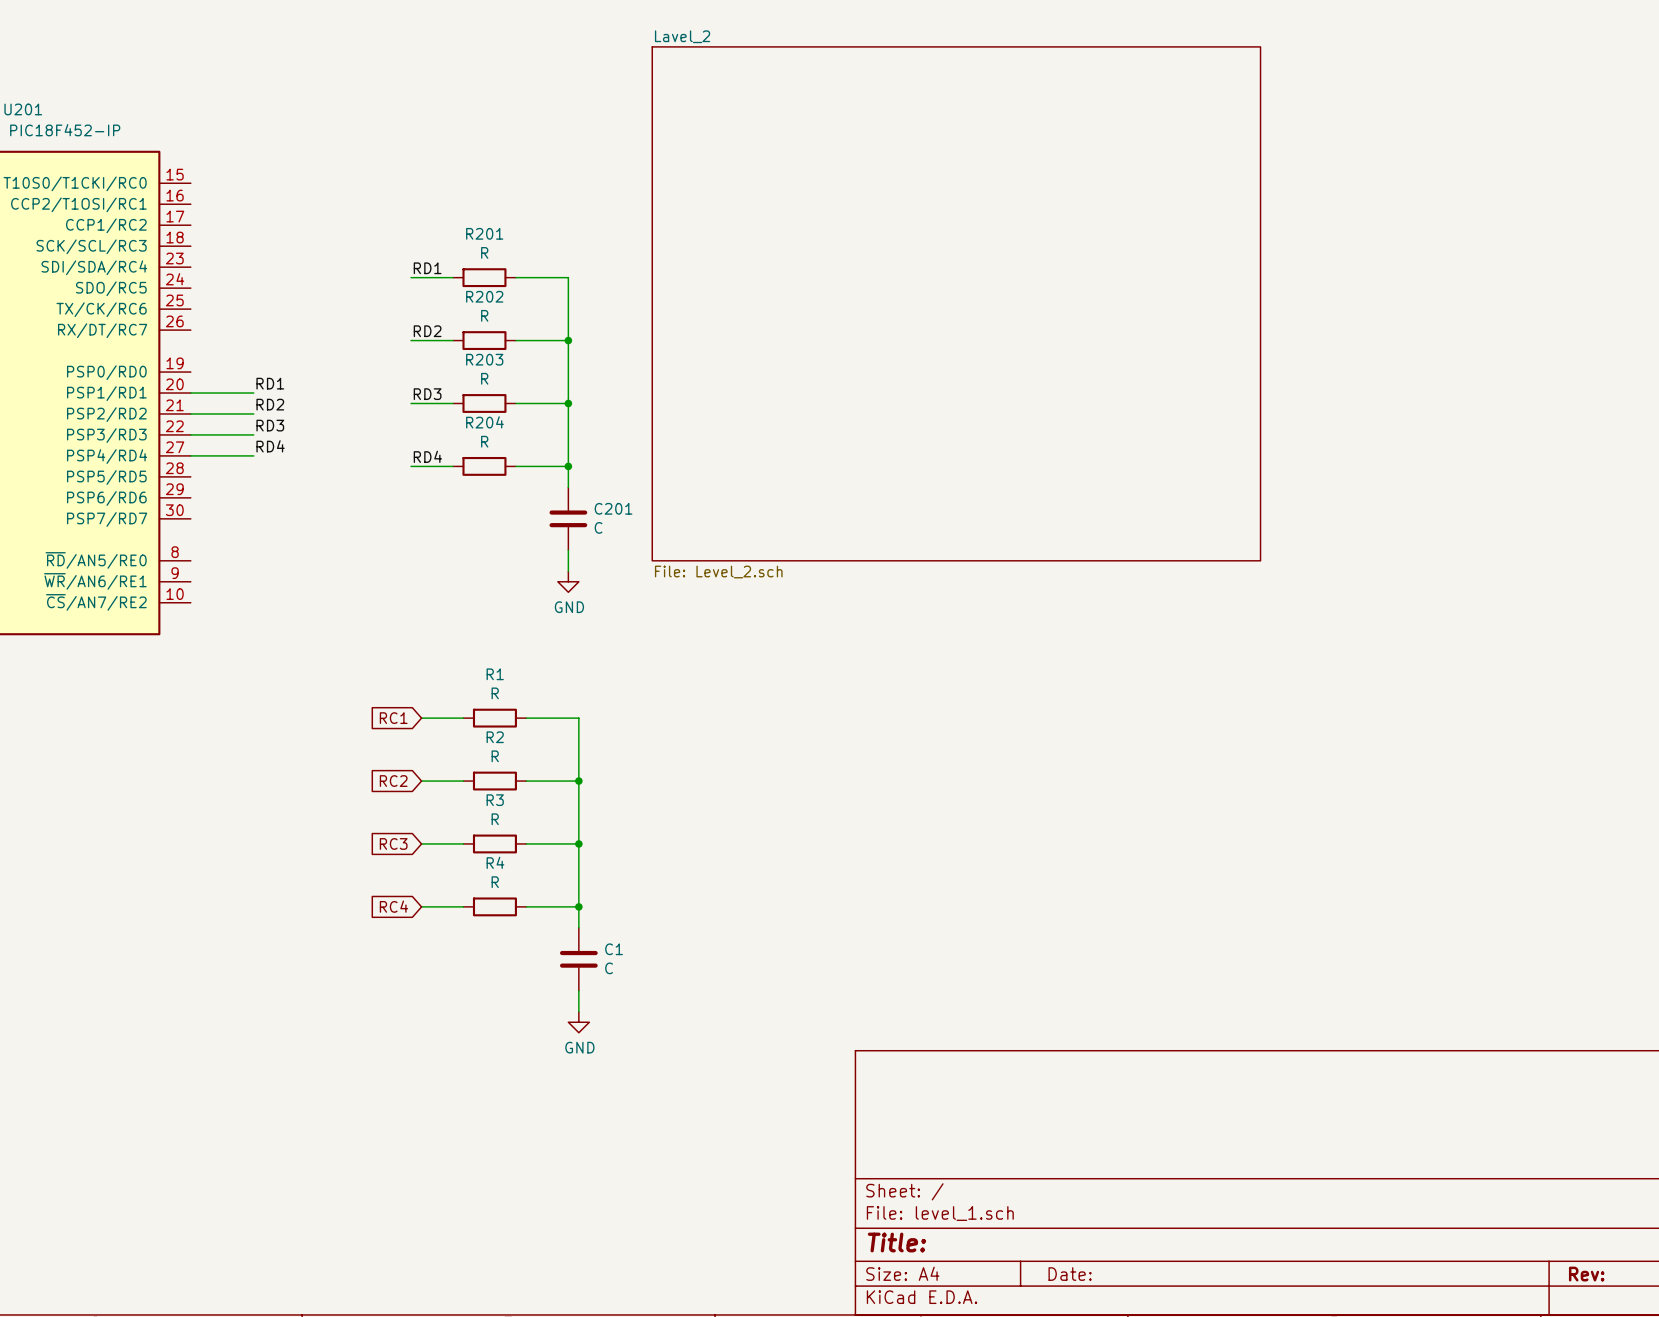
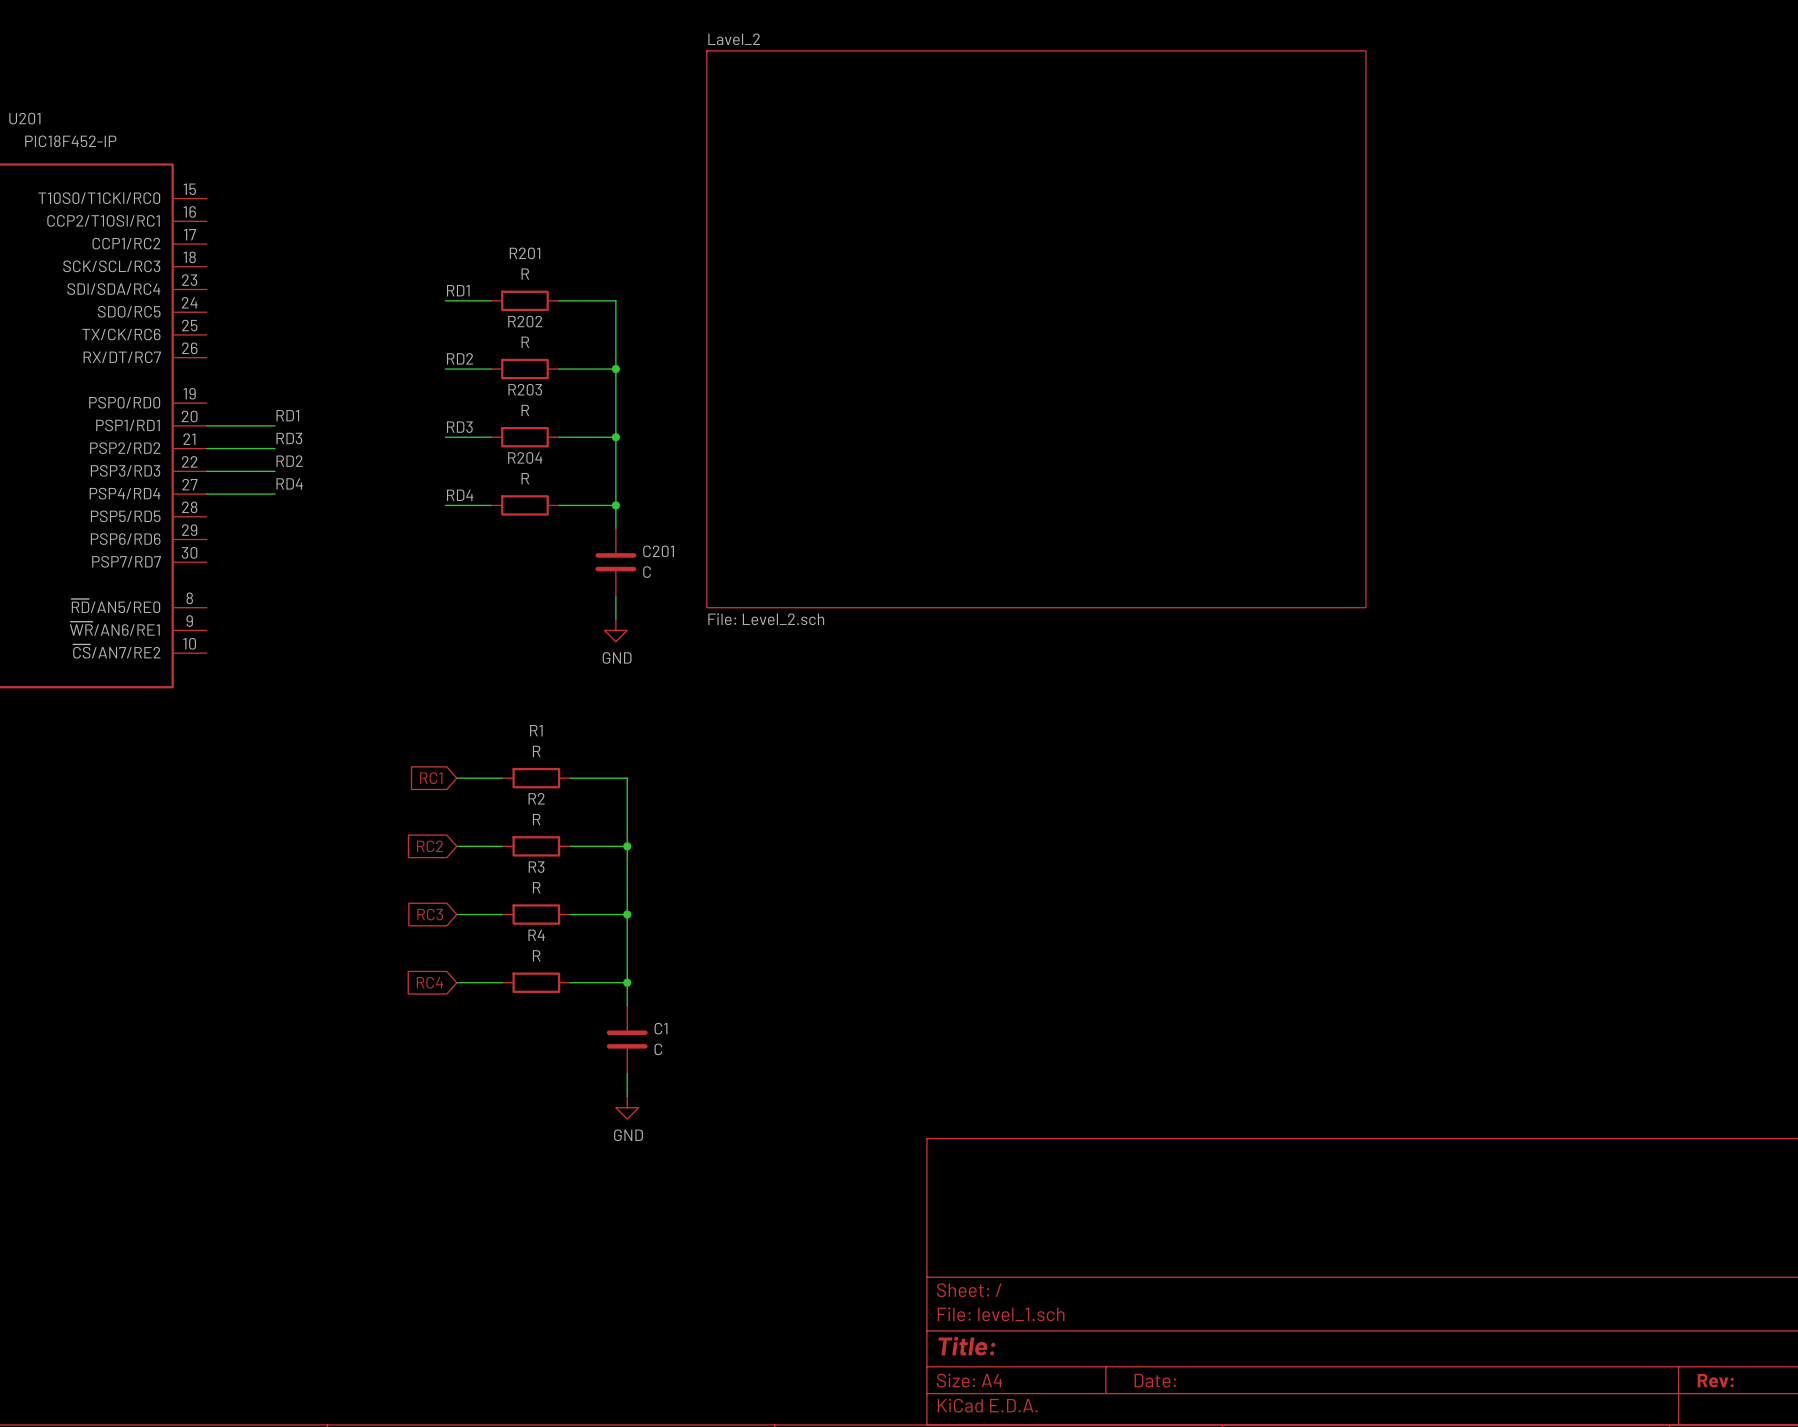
label: RD2 (270, 404) -> RD3 (289, 438)
label: RD3 (270, 425) -> RD2 (289, 461)

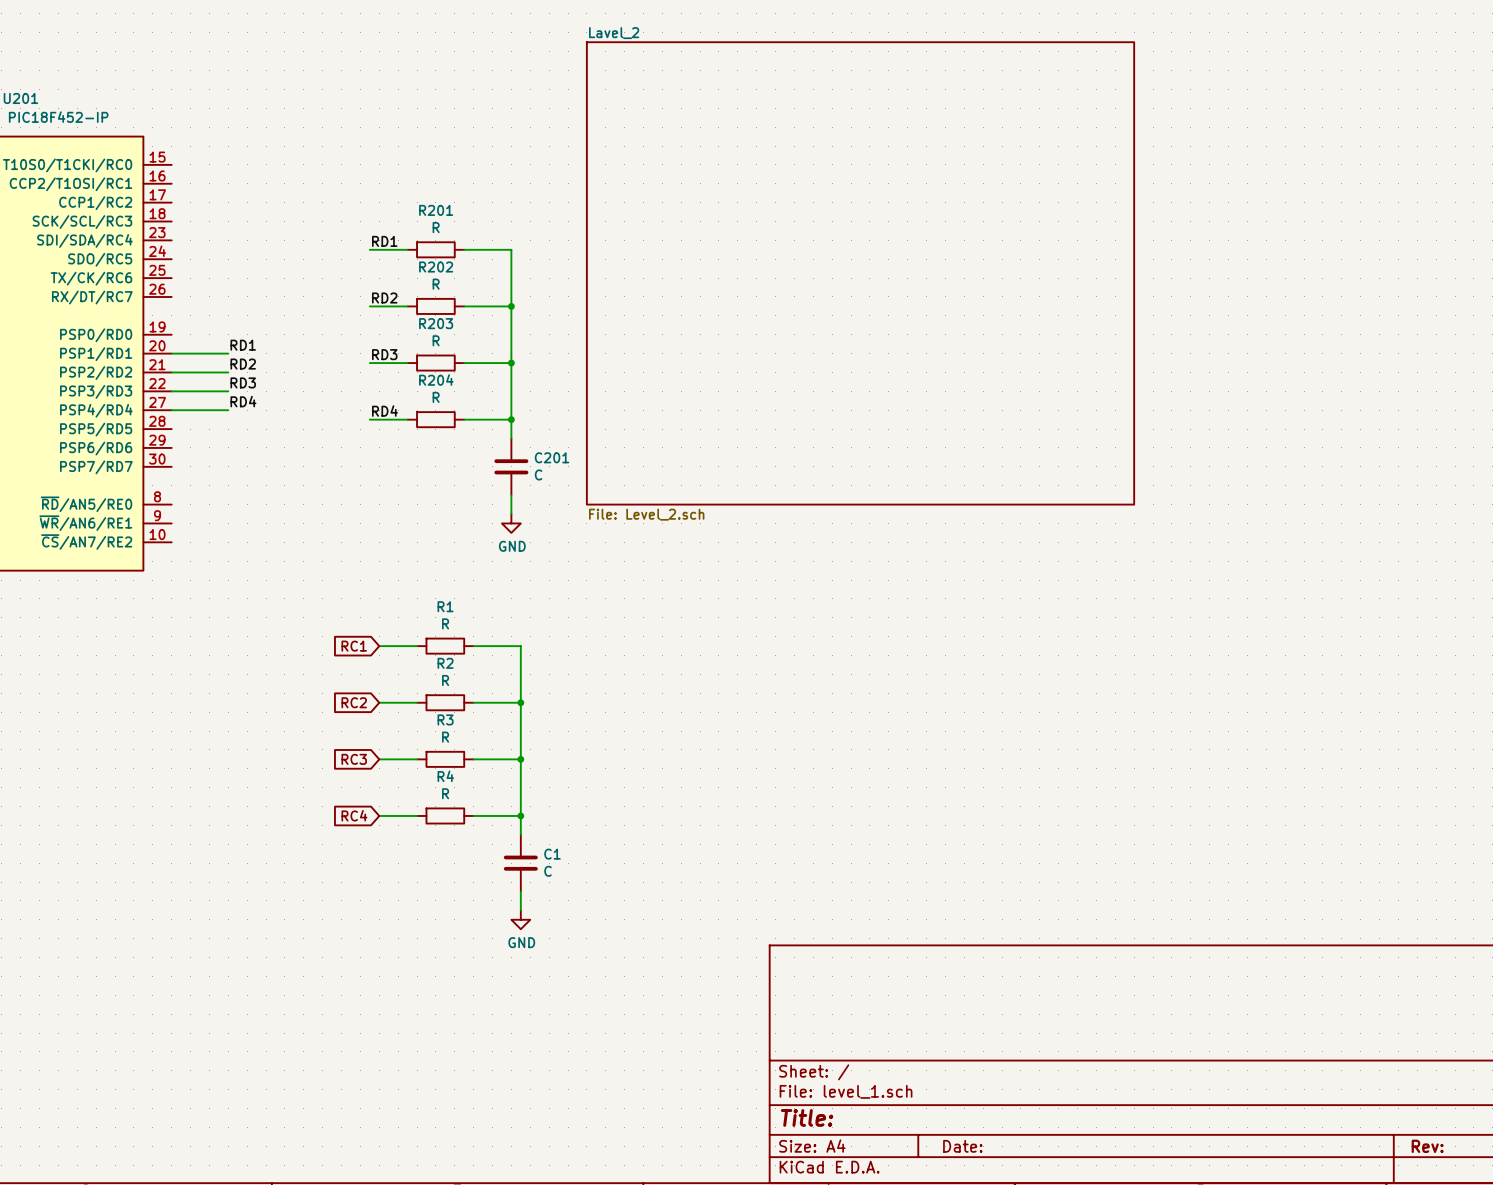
label: RD3 (289, 438) -> RD2 (243, 364)
label: RD2 (289, 461) -> RD3 (243, 382)

